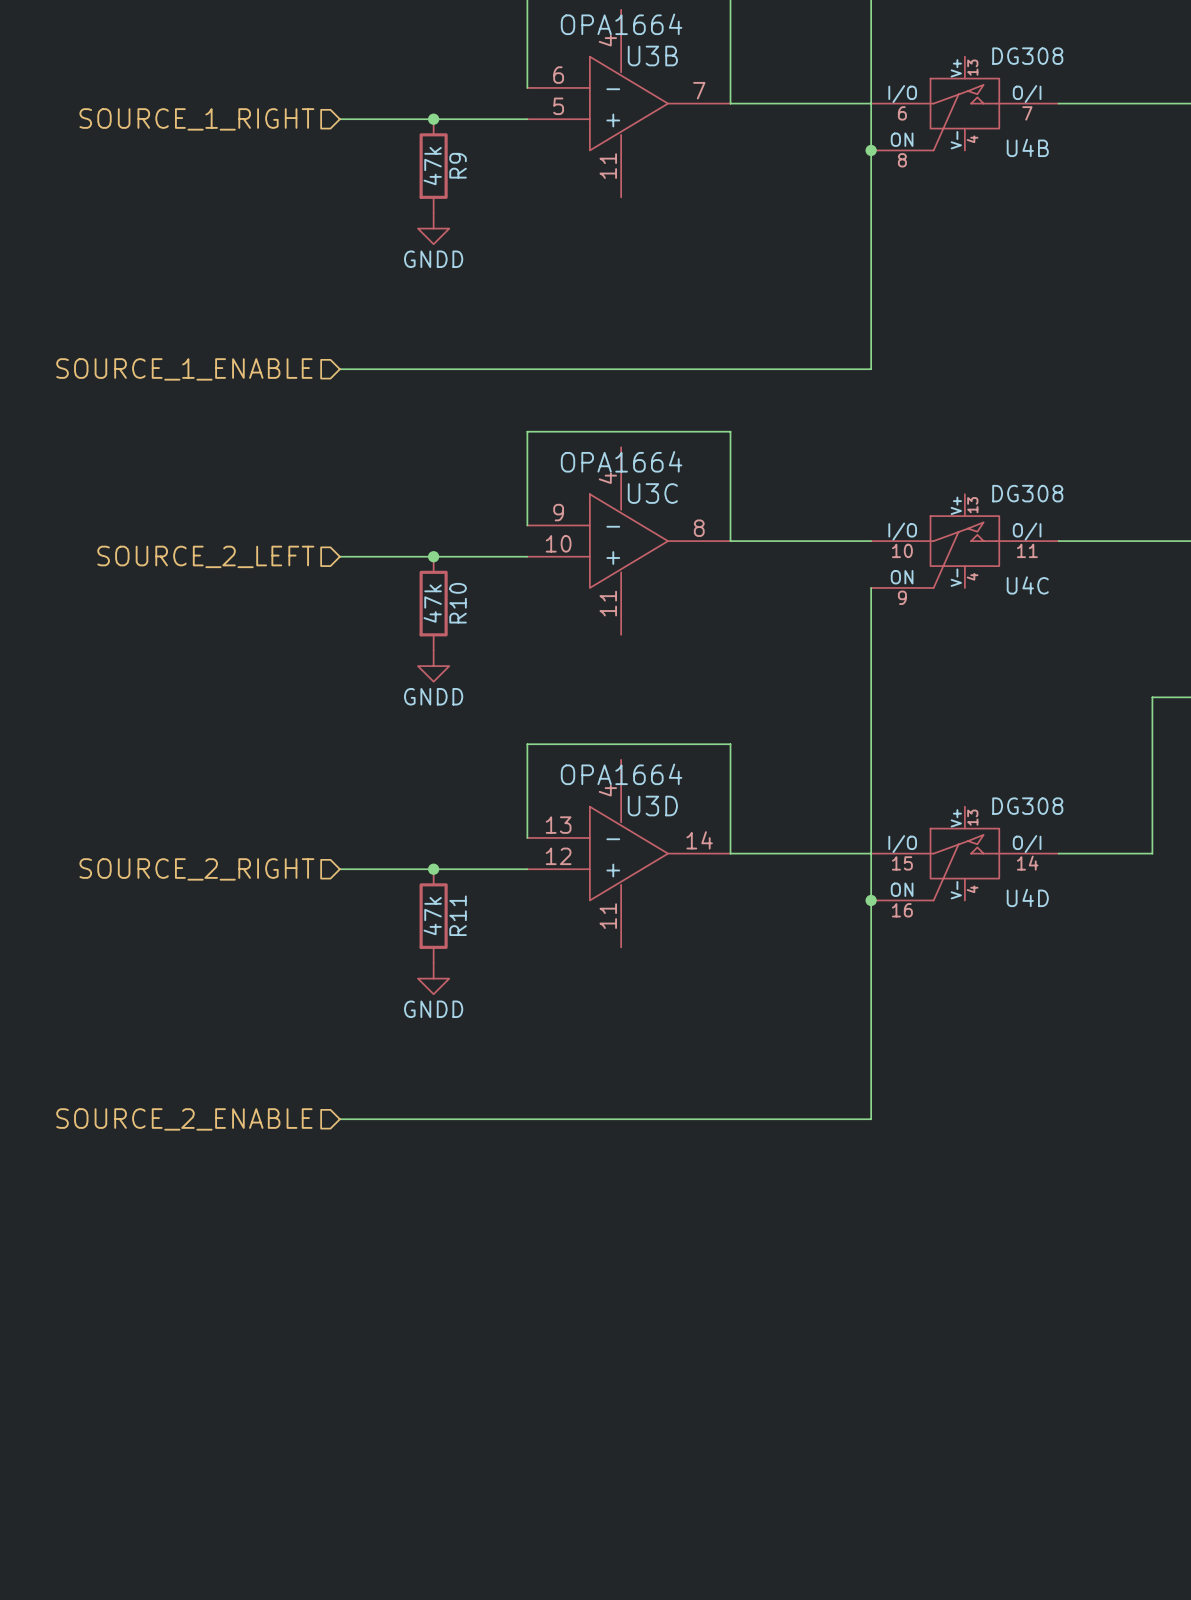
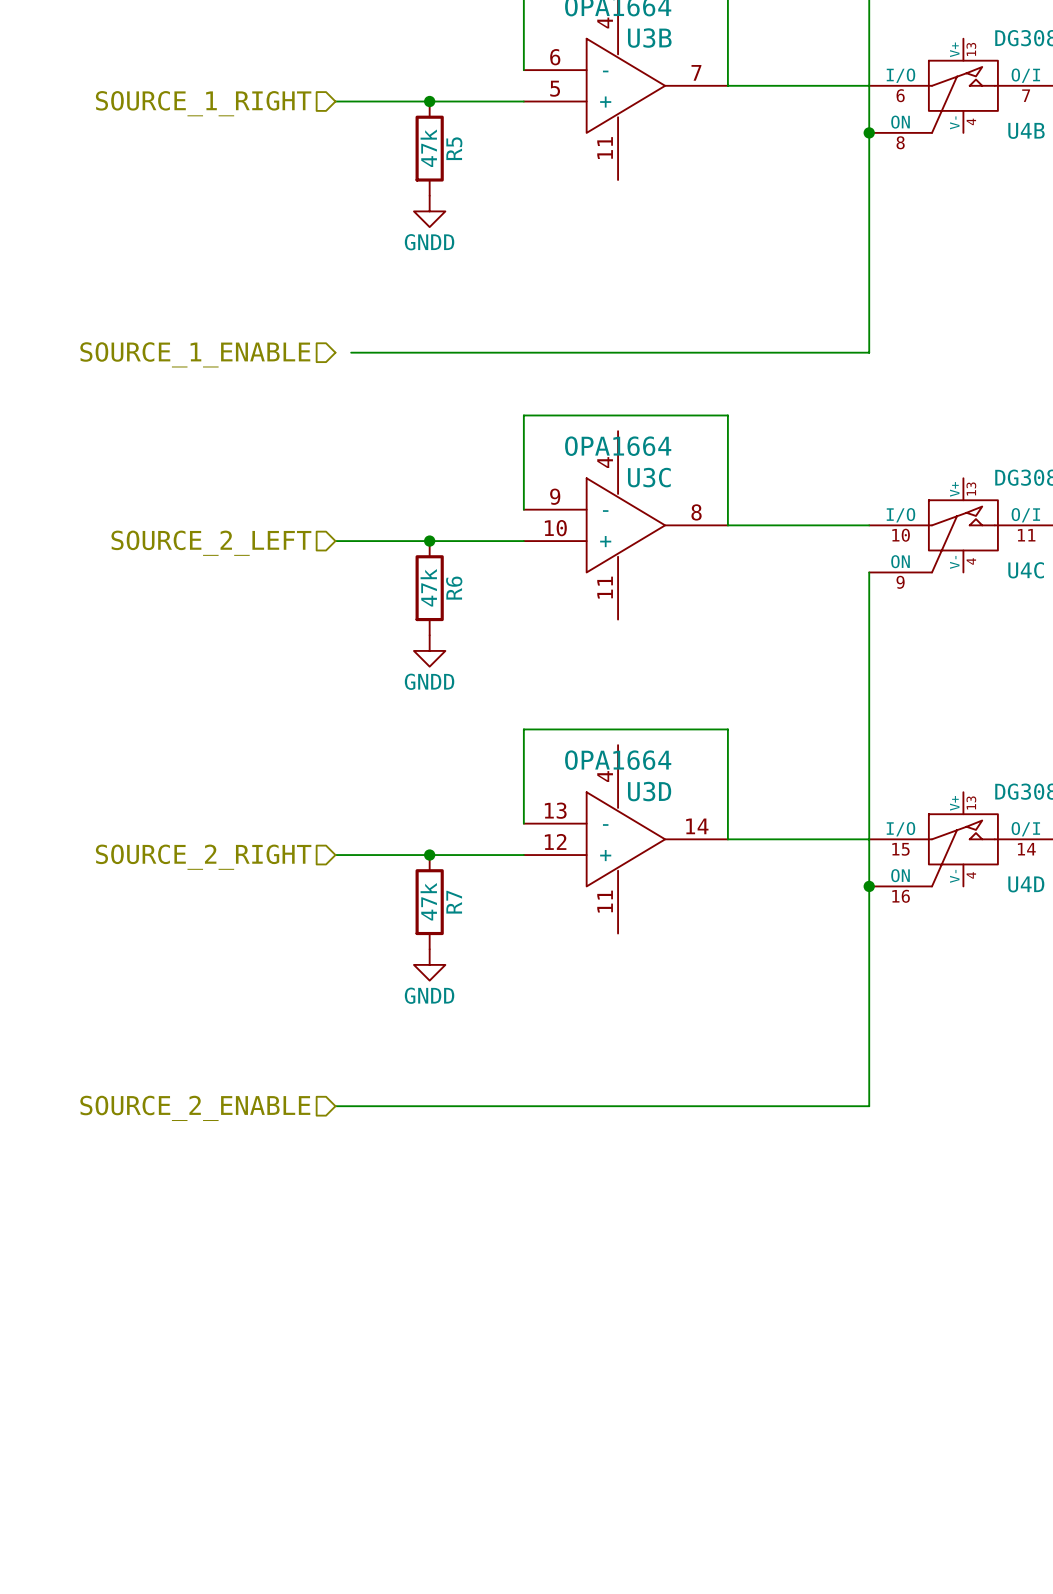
R9 name: R9 (458, 165) -> R5 (454, 148)
wire: (339, 369) (355, 369) -> none
R10 name: R10 (458, 603) -> R6 (454, 588)
R11 name: R11 (458, 915) -> R7 (454, 902)

